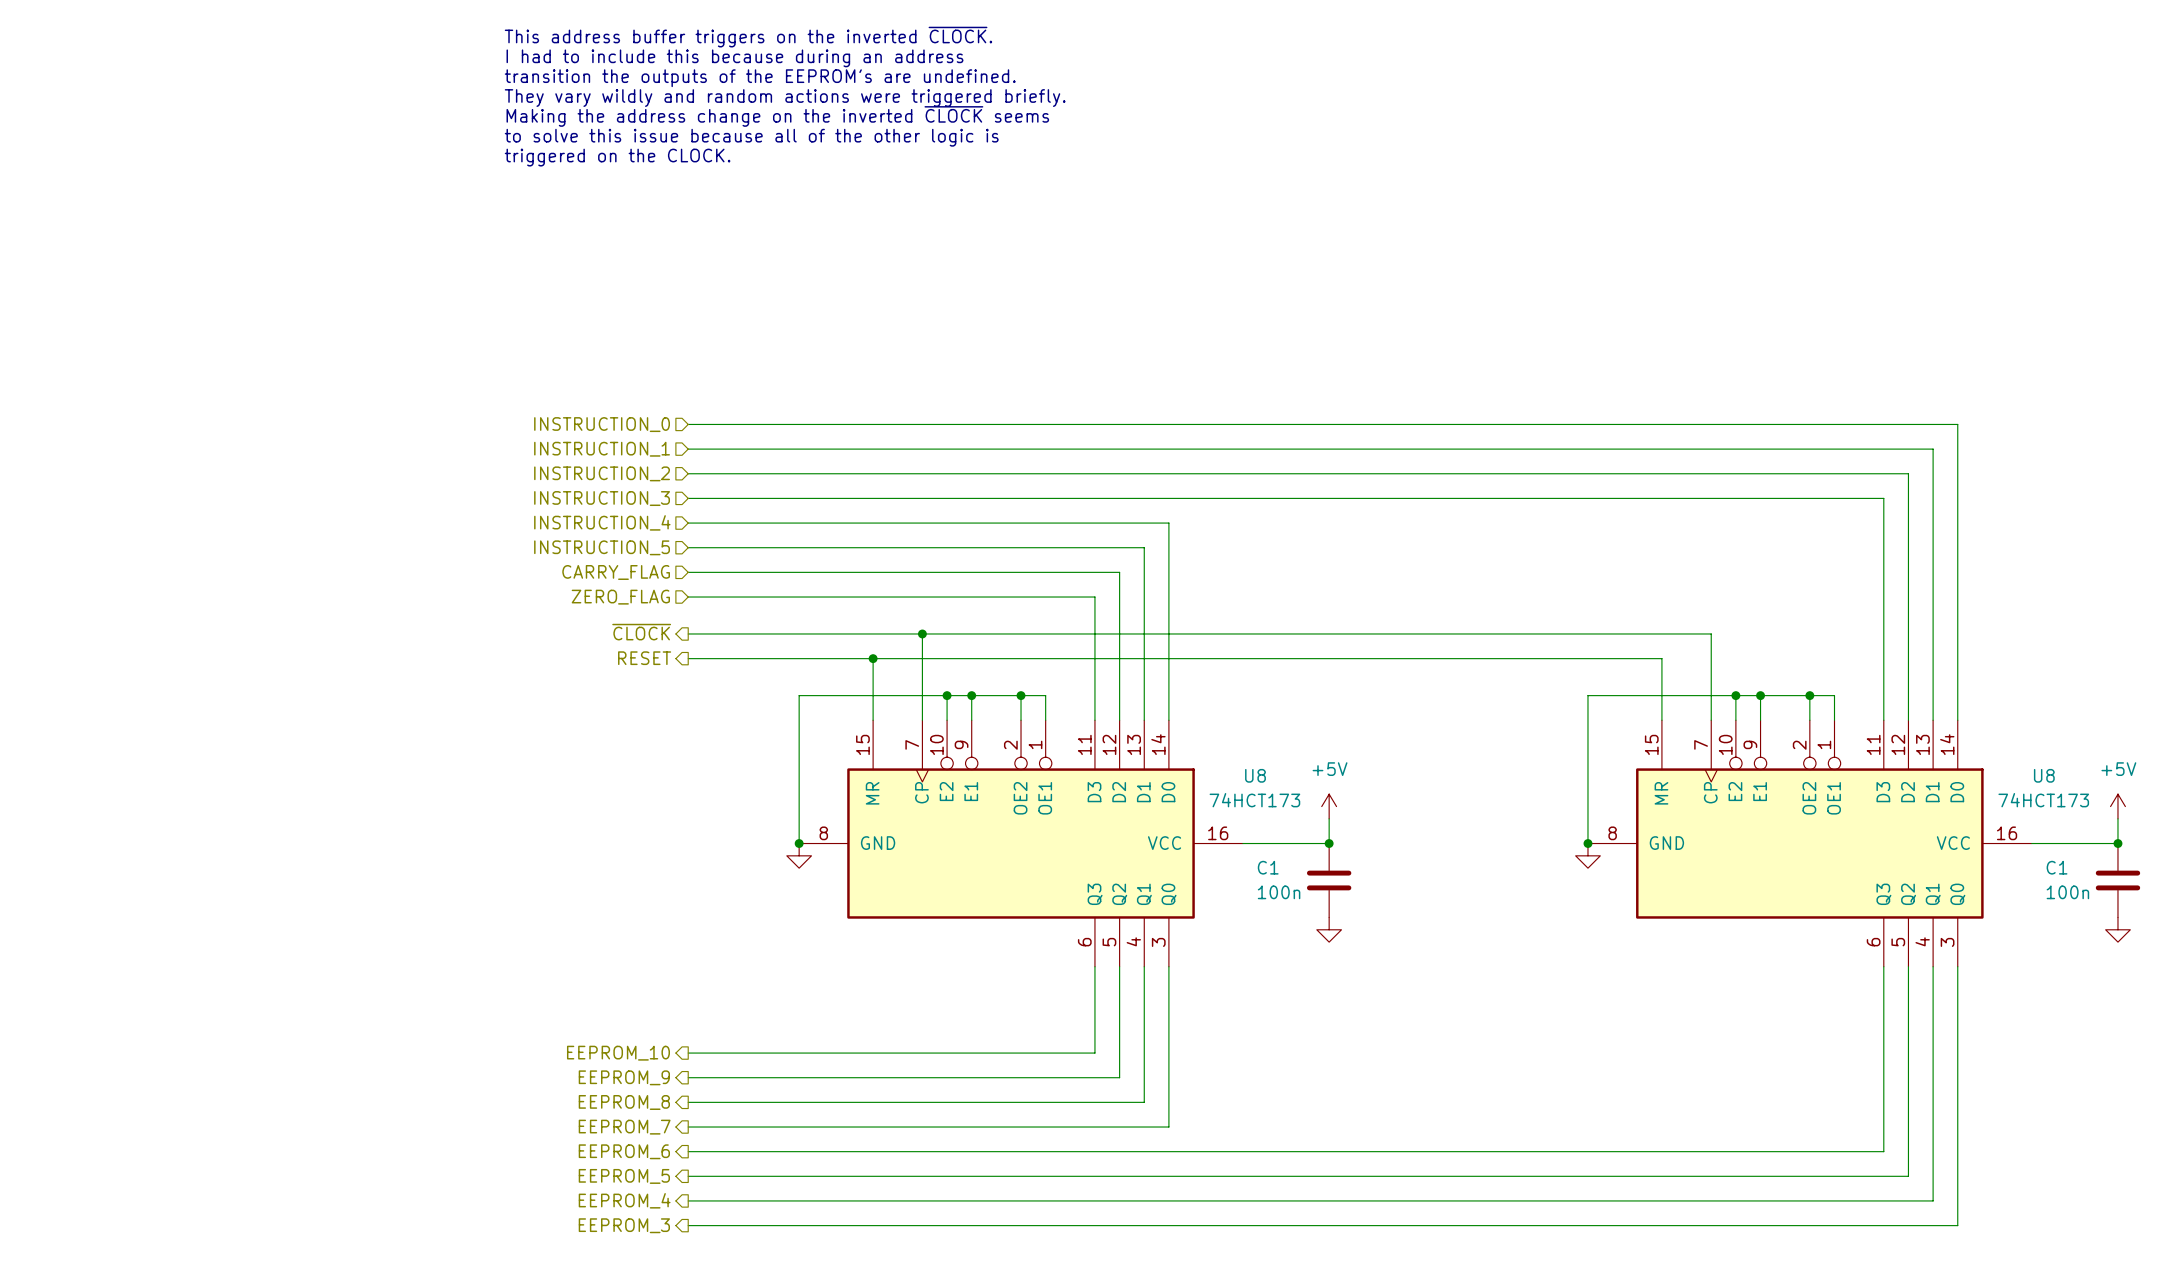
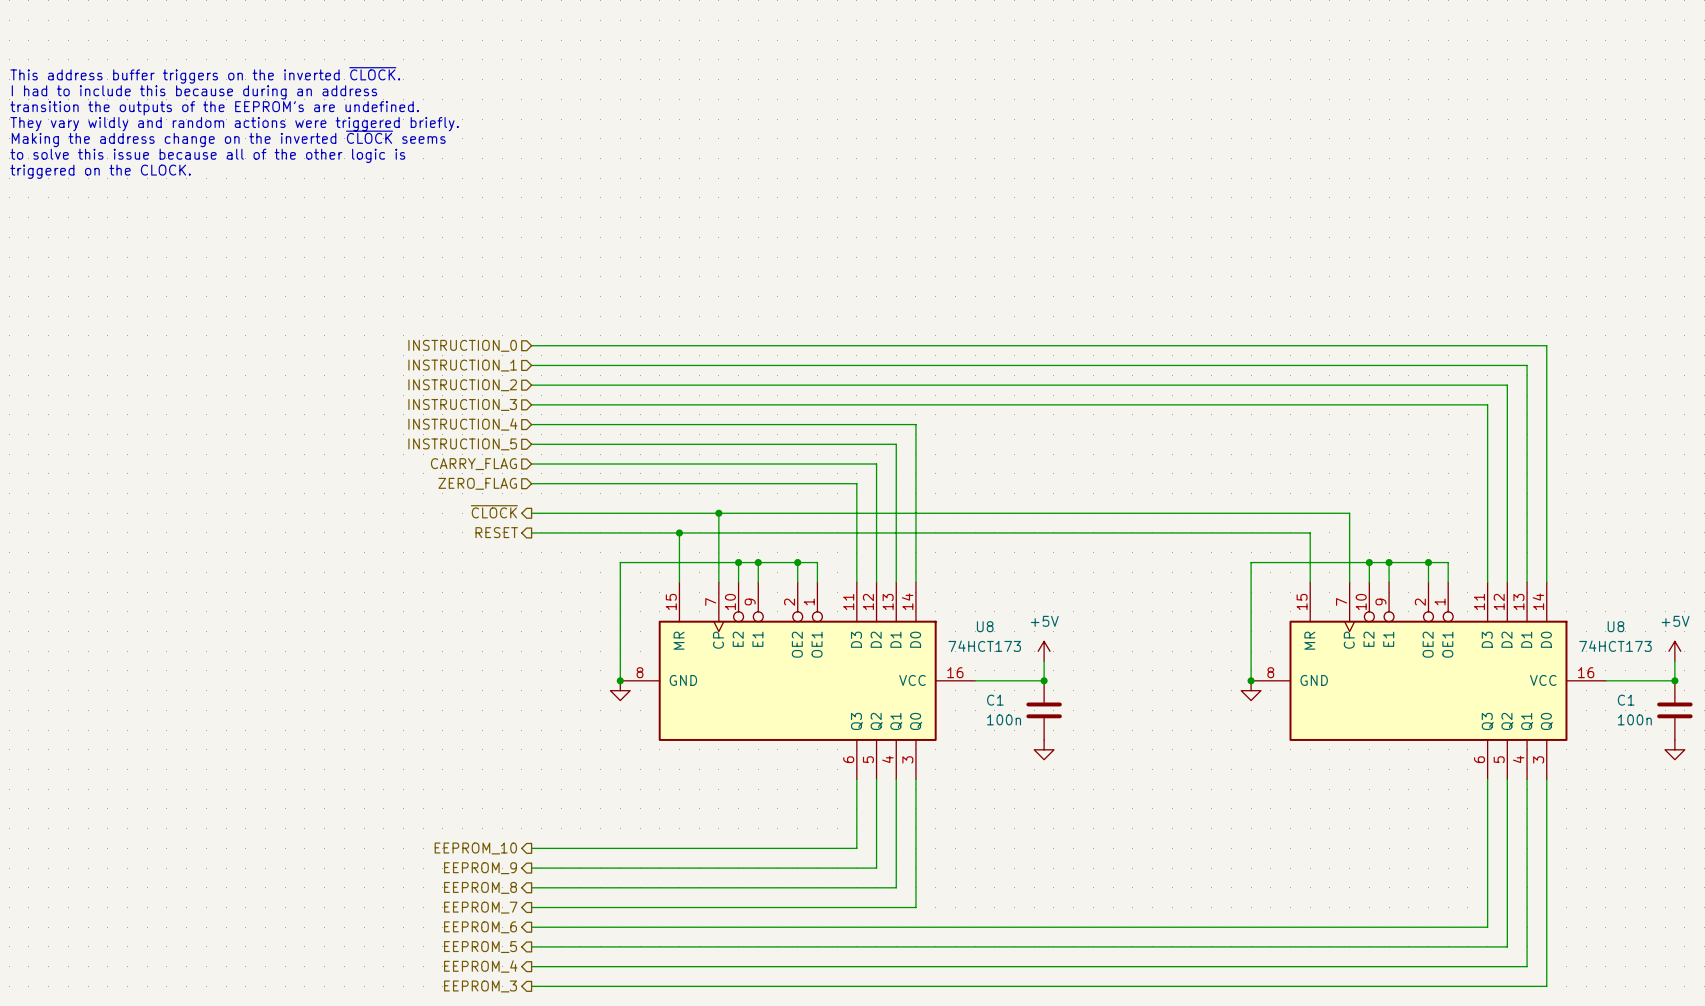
text: This address buffer triggers on the inverted ~{CLOCK}. (748, 37) -> none
text: I had to include this because during an address (734, 58) -> none
text: transition the outputs of the EEPROM's are undefined. (760, 78) -> none
text: none -> This address buffer triggers on the inverted ~{CLOCK}. (205, 75)
text: They vary wildly and random actions were triggered briefly. (785, 98) -> none
text: none -> I had to include this because during an address (194, 92)
text: Making the address change on the inverted ~{CLOCK} seems (777, 116) -> none
text: none -> transition the outputs of the EEPROM's are undefined. (214, 108)
text: to solve this issue because all of the other logic is (751, 137) -> none
text: none -> They vary wildly and random actions were triggered briefly. (234, 124)
text: triggered on the CLOCK. (617, 157) -> none
text: none -> Making the address change on the inverted ~{CLOCK} seems (228, 138)
text: none -> to solve this issue because all of the other logic is (207, 155)
text: none -> triggered on the CLOCK. (100, 171)

